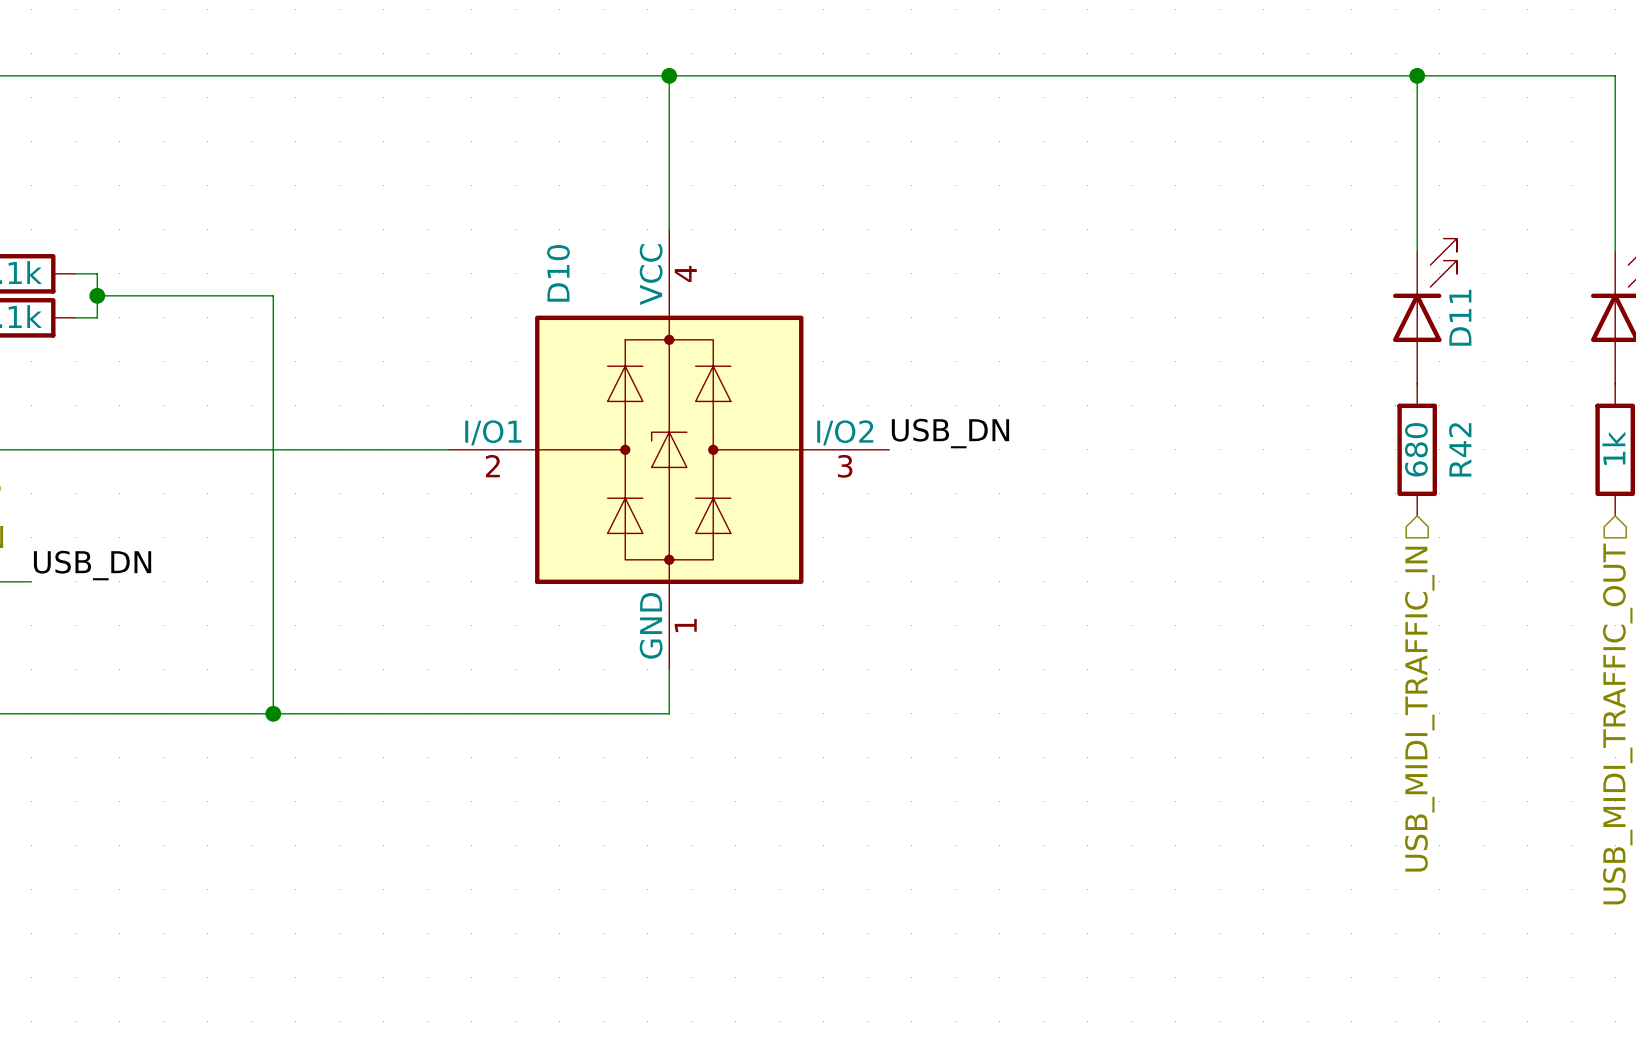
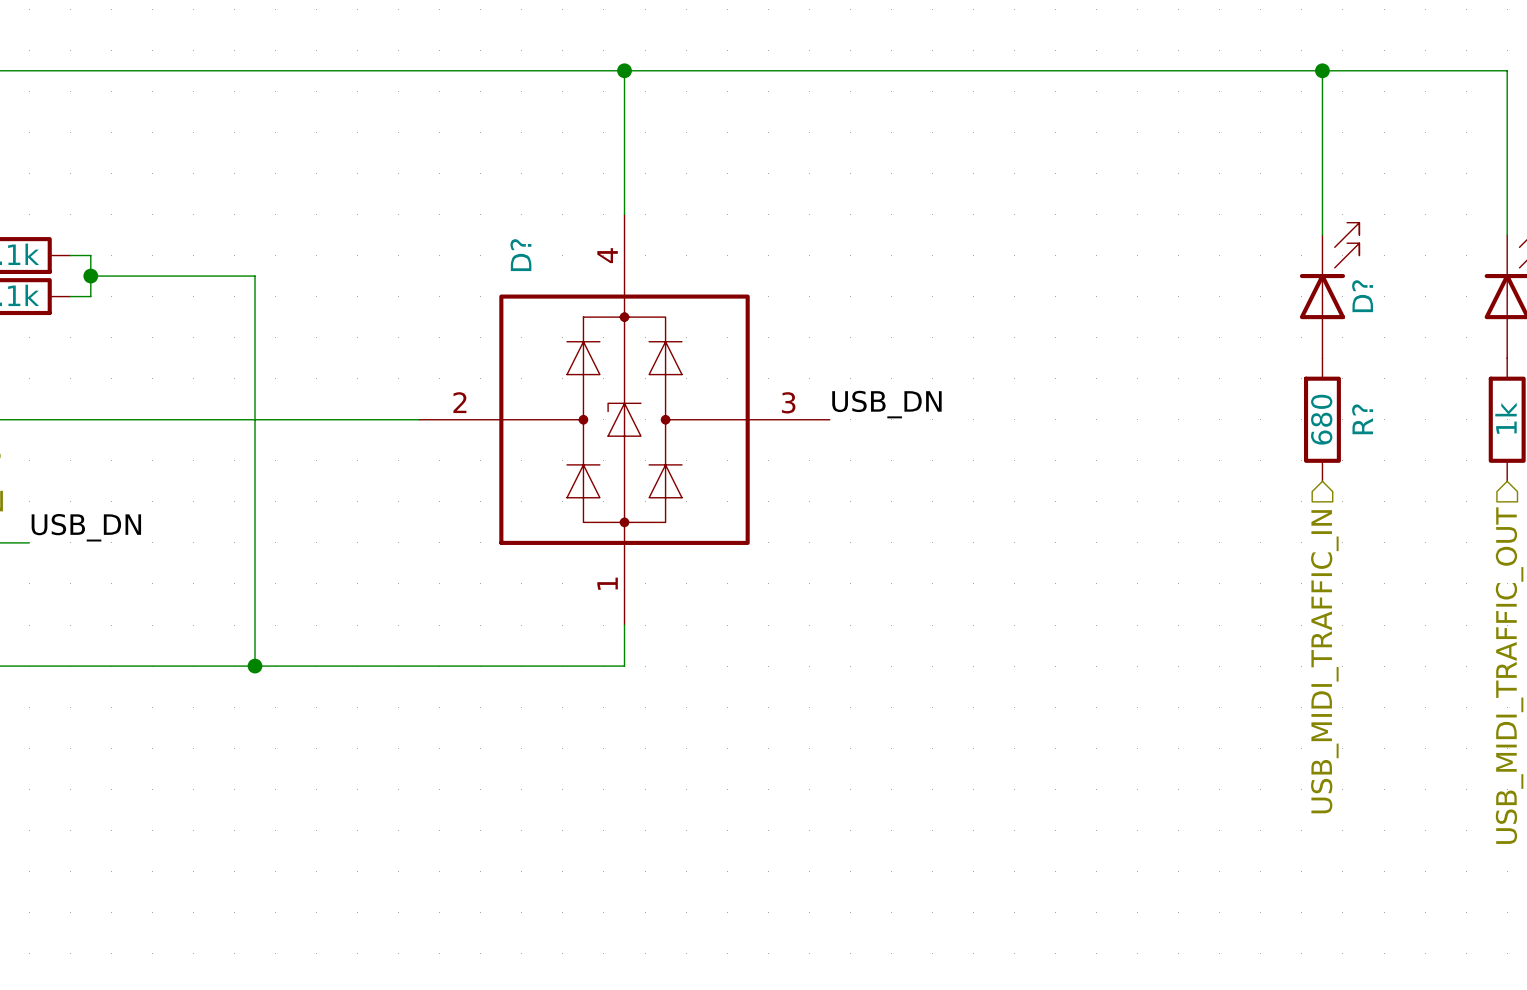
D11 name: D11 (1460, 317) -> D? (1362, 296)
D10: (669, 449) -> none
D?: none -> (624, 419)
R42 name: R42 (1460, 449) -> R? (1362, 419)

